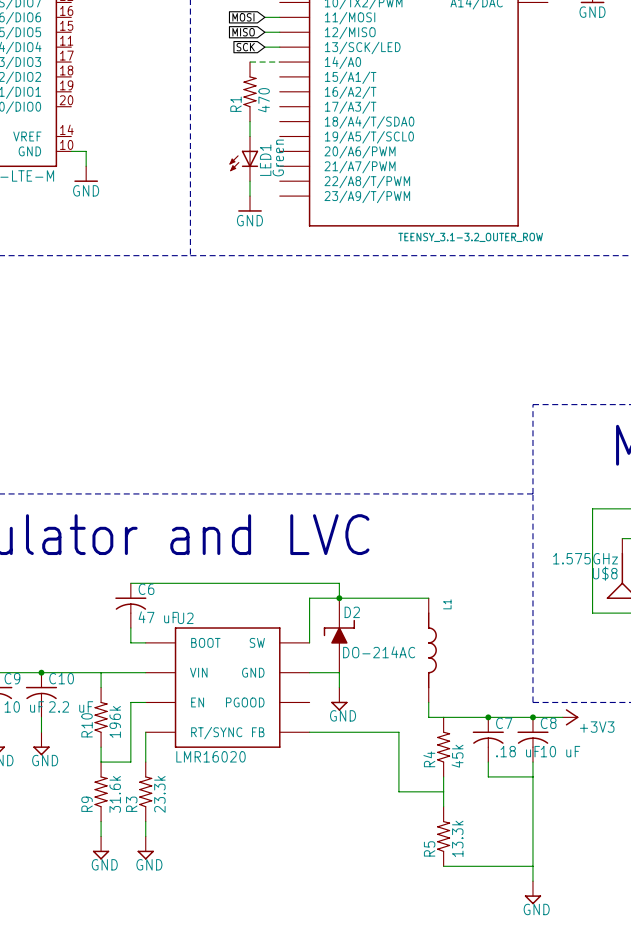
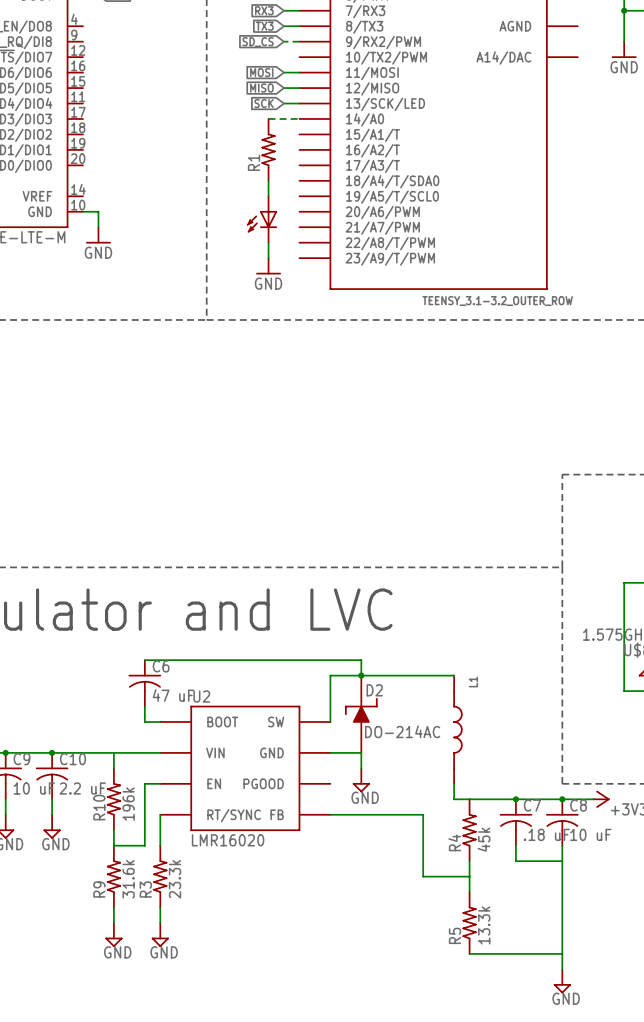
R1 value: 470 (263, 100) -> none
LED1 value: Green (278, 157) -> none
LED1 name: LED1 (265, 160) -> none

